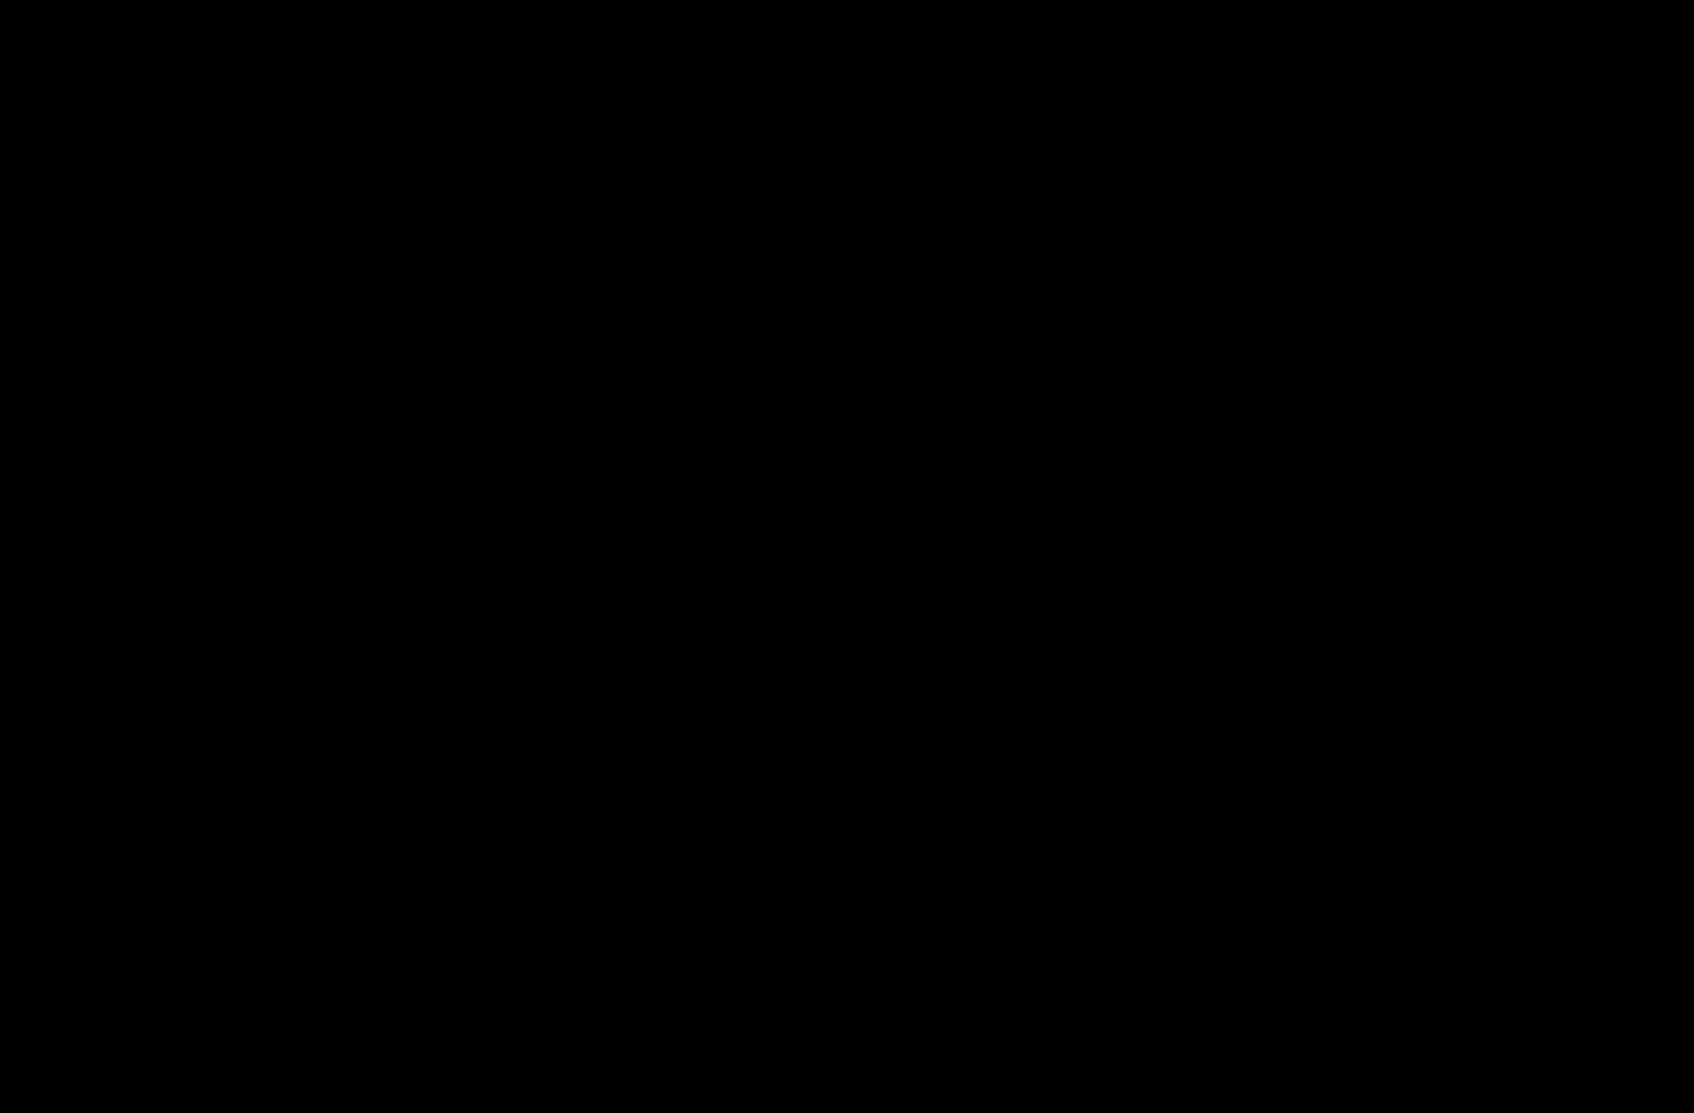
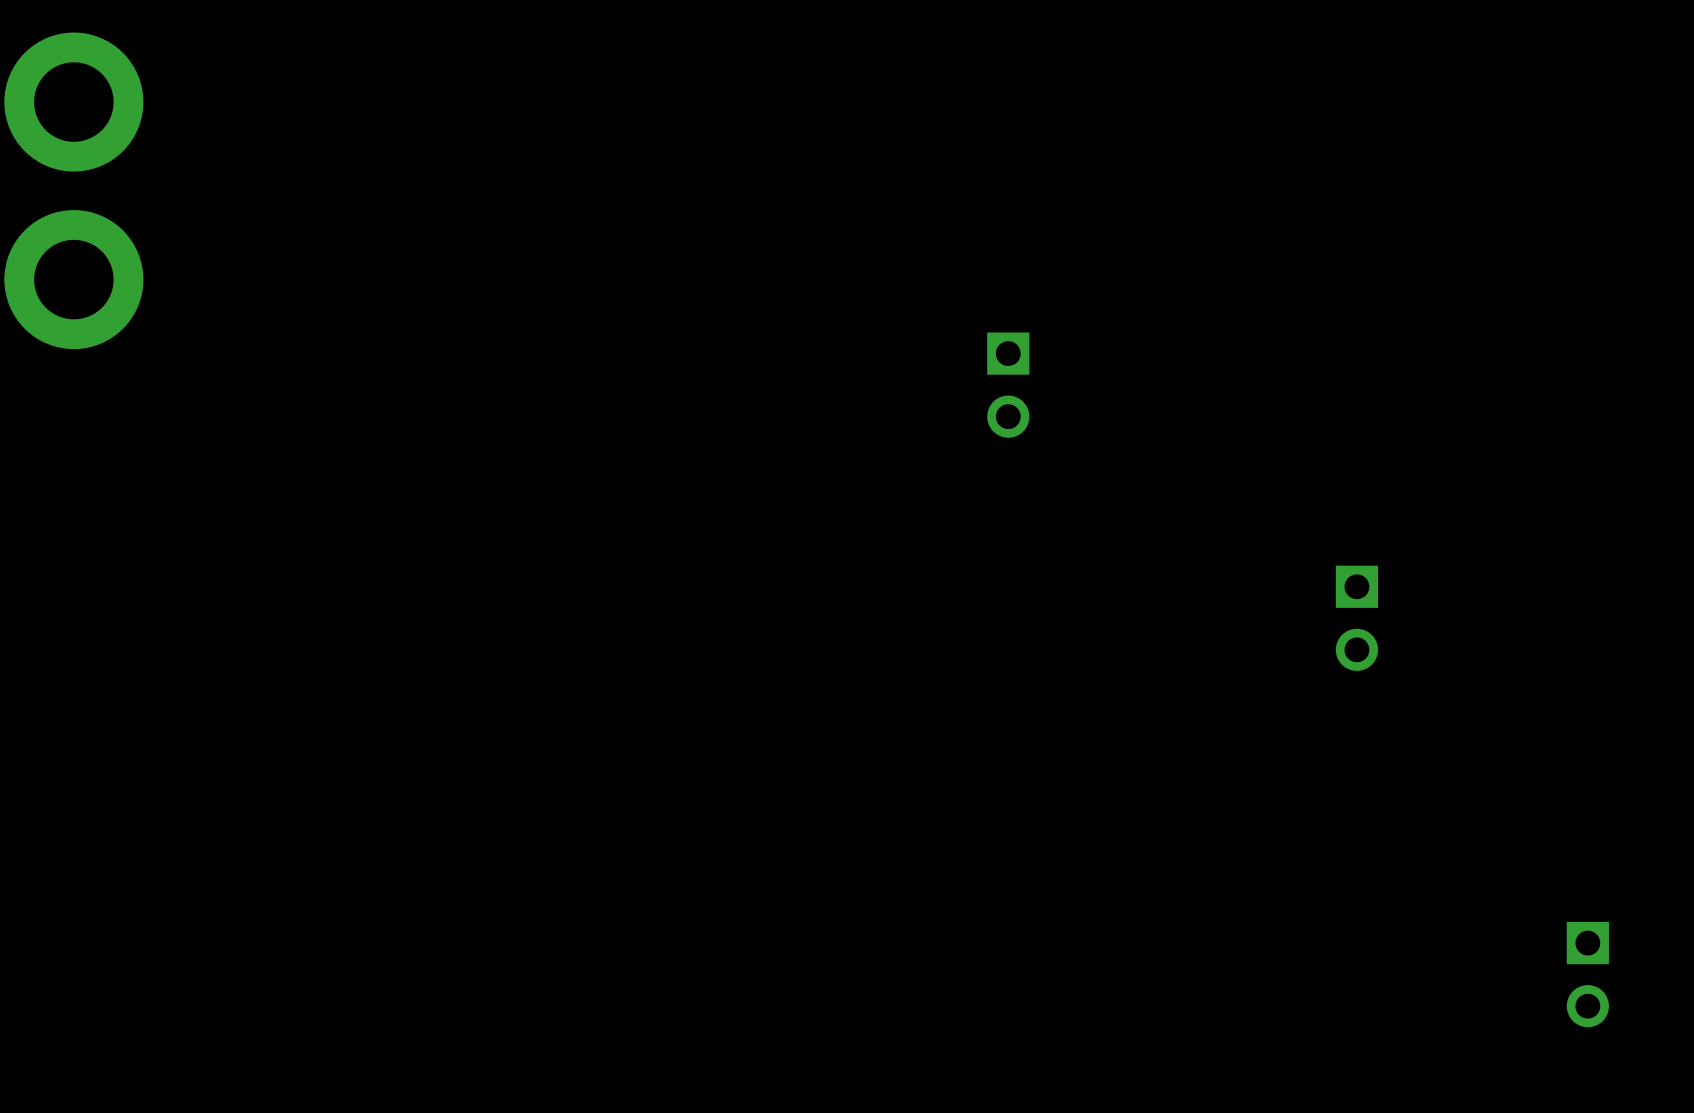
part: none -> (73, 102)
part: none -> (73, 279)
part: none -> (1008, 385)
part: none -> (1356, 618)
part: none -> (1587, 974)

